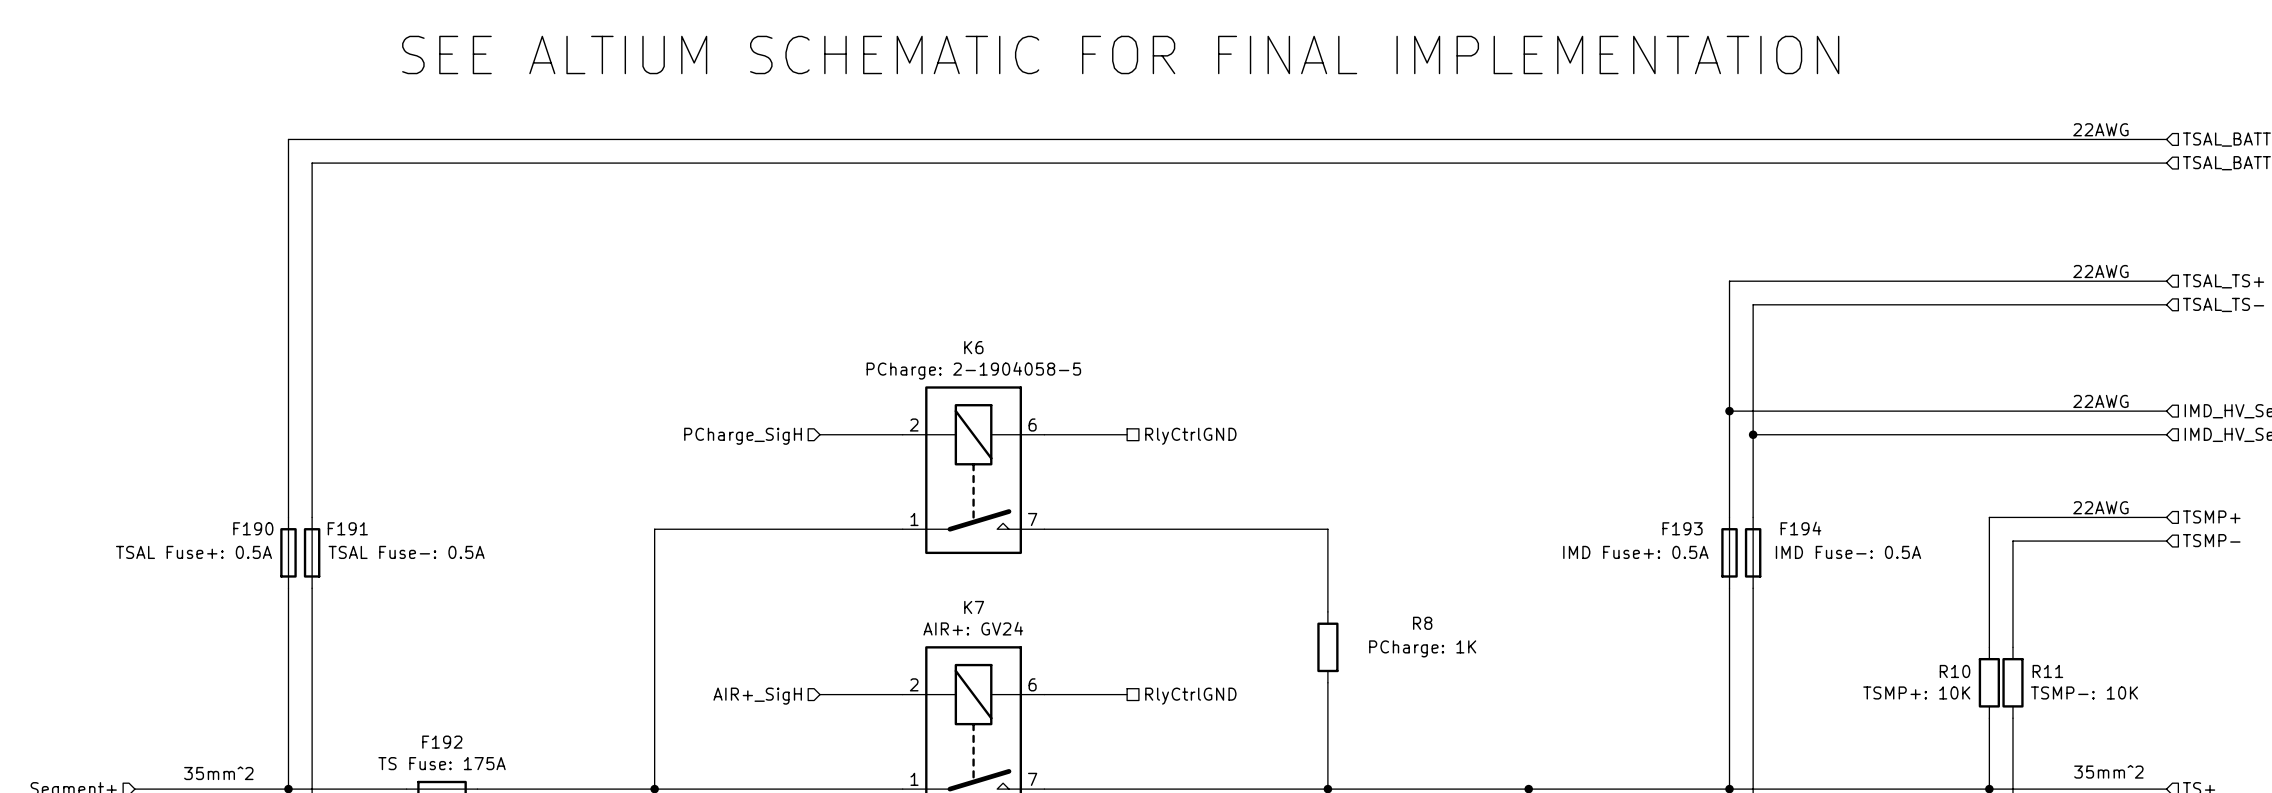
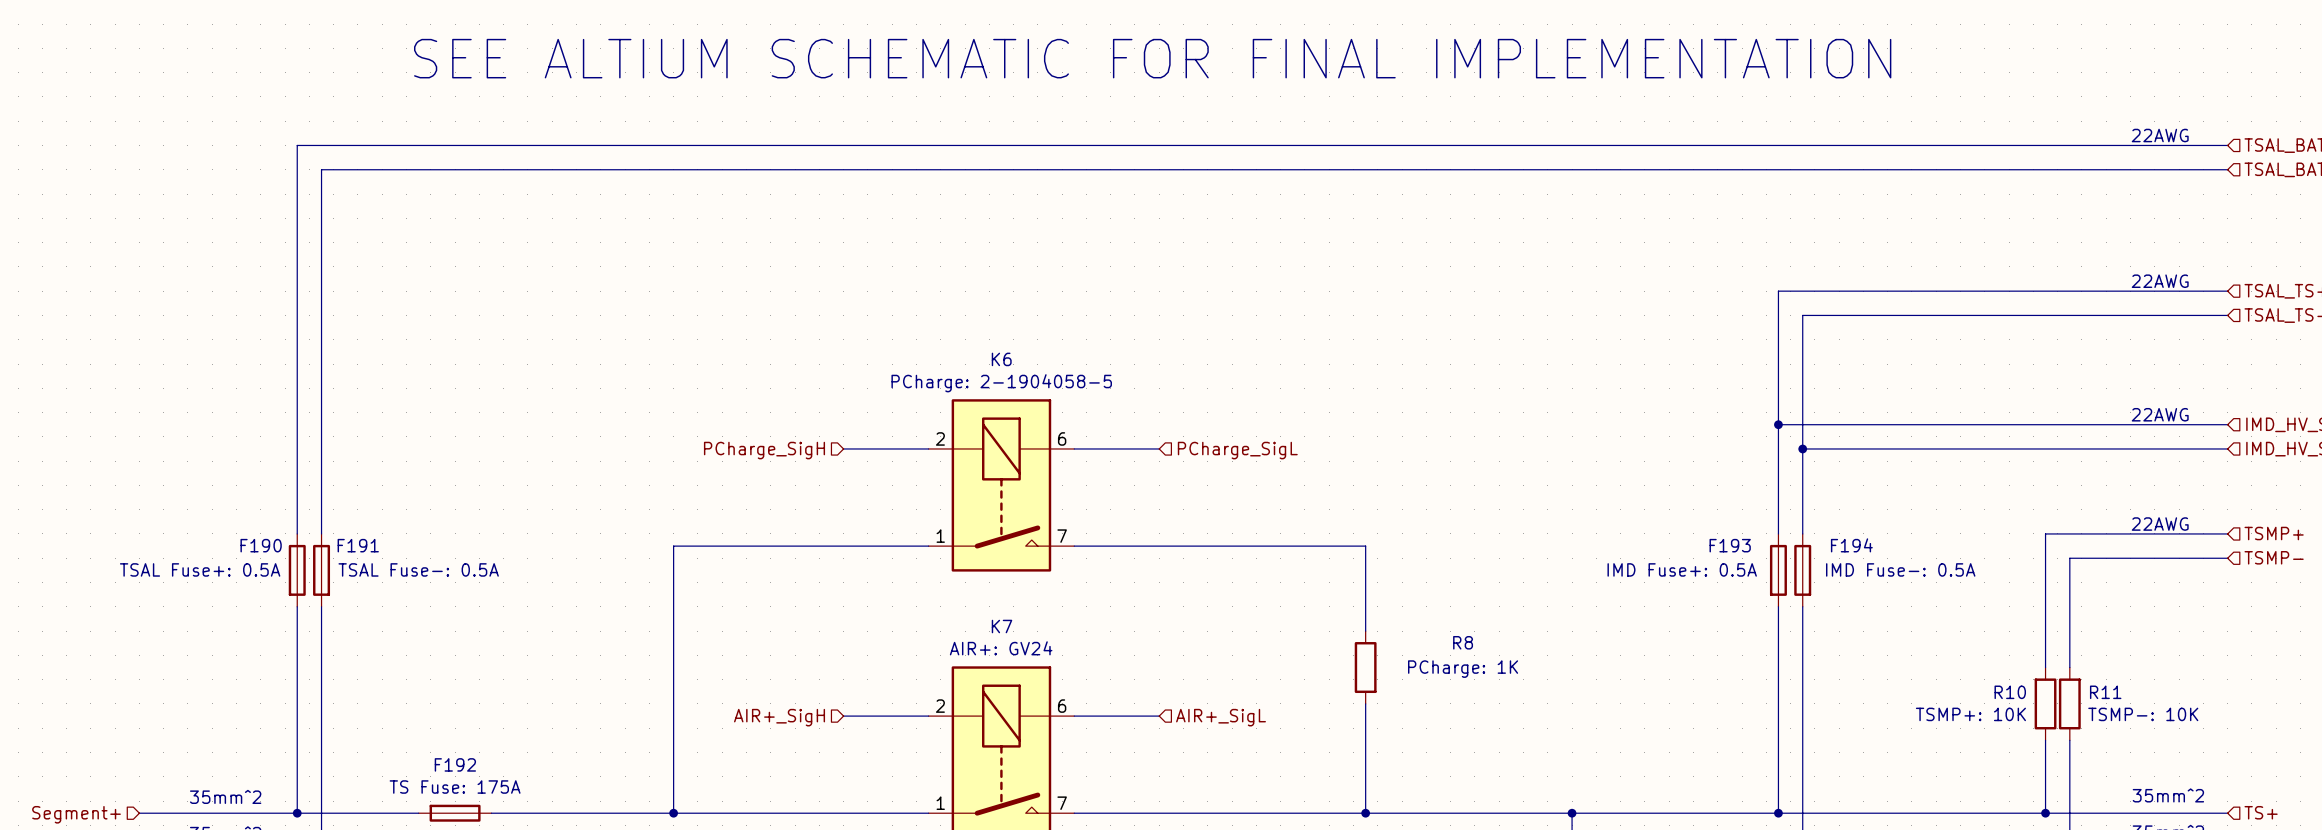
hierarchical label shape: passive (1190, 436) -> input (1237, 450)
hierarchical label: RlyCtrlGND (1190, 436) -> PCharge_SigL (1237, 450)
hierarchical label shape: passive (1190, 696) -> input (1221, 717)
hierarchical label: RlyCtrlGND (1190, 696) -> AIR+_SigL (1221, 717)

